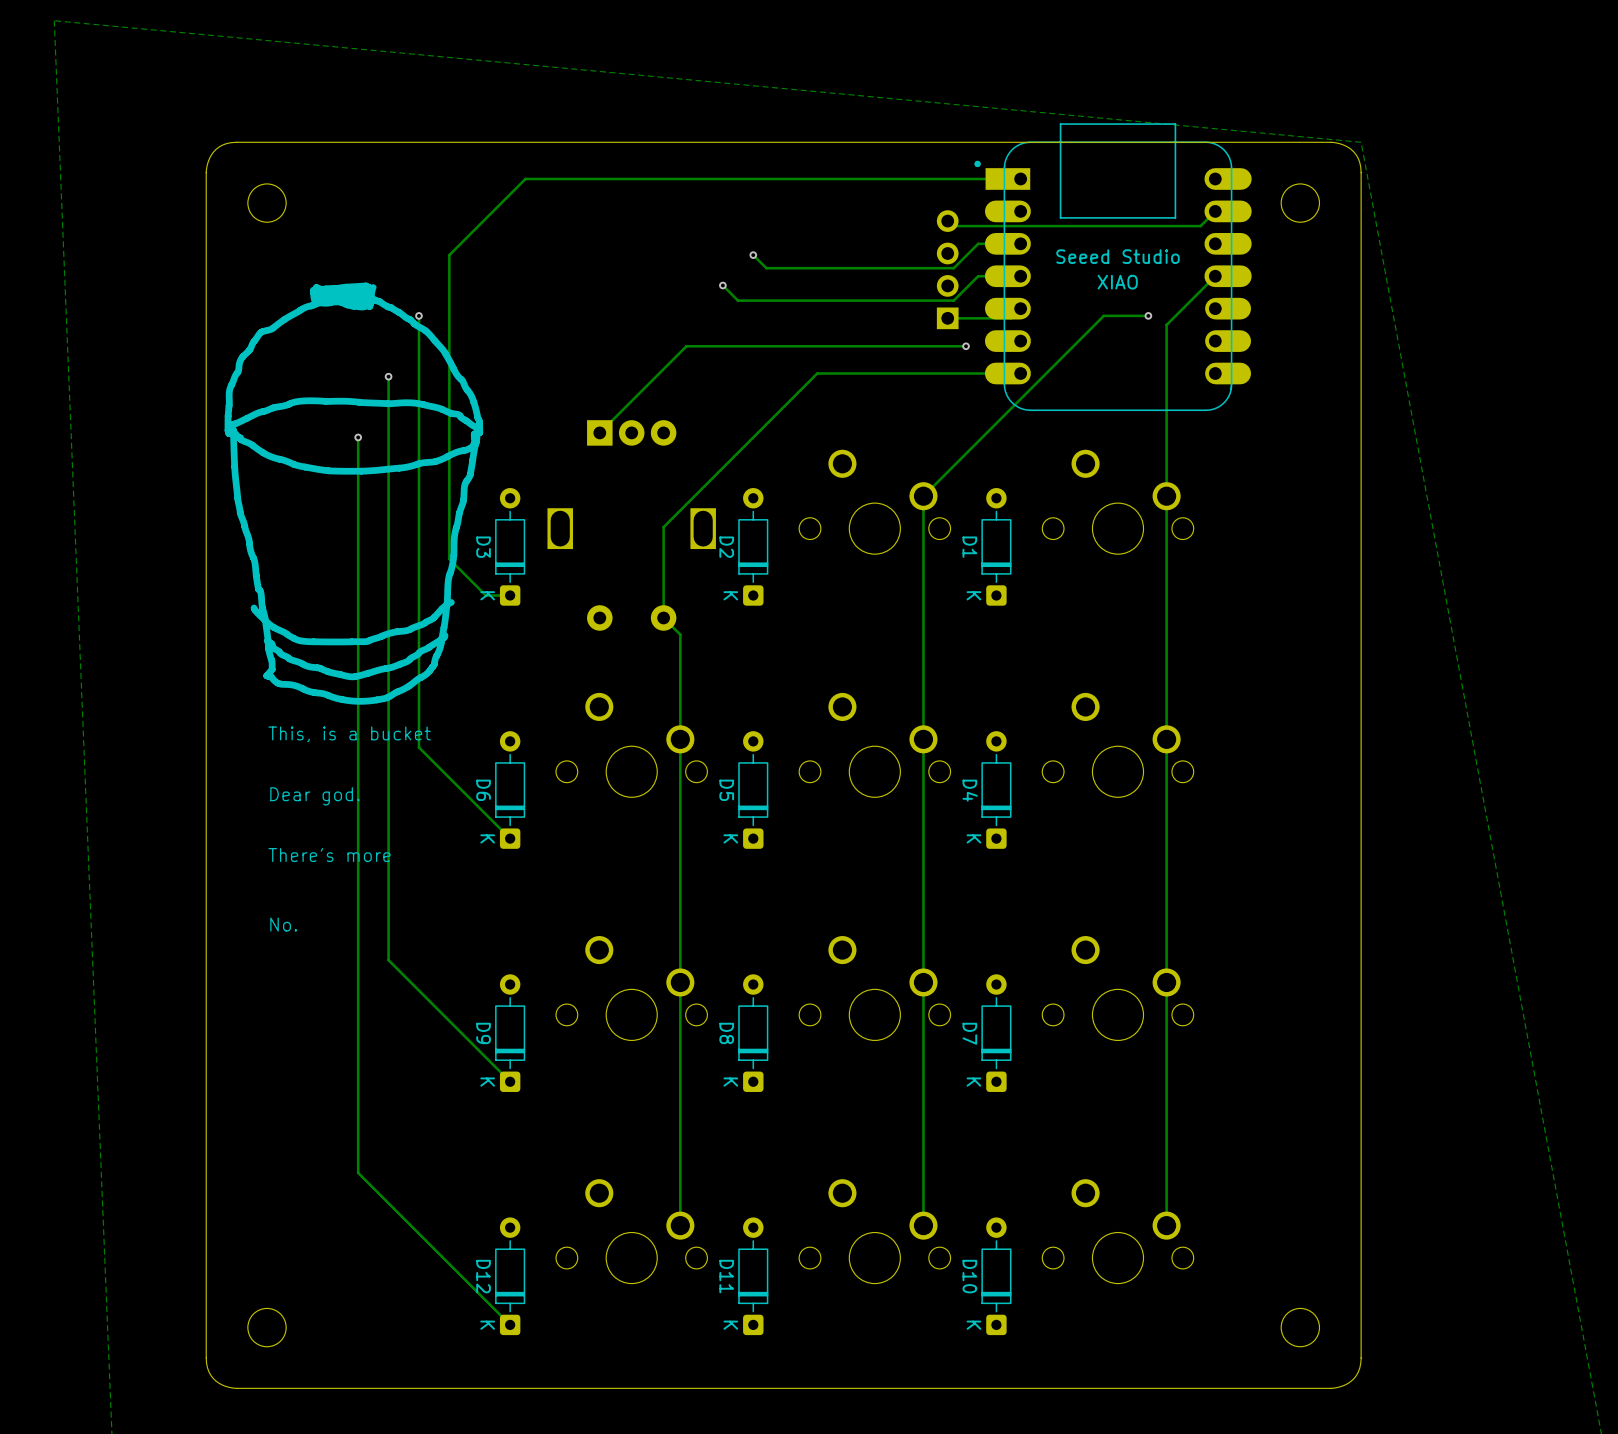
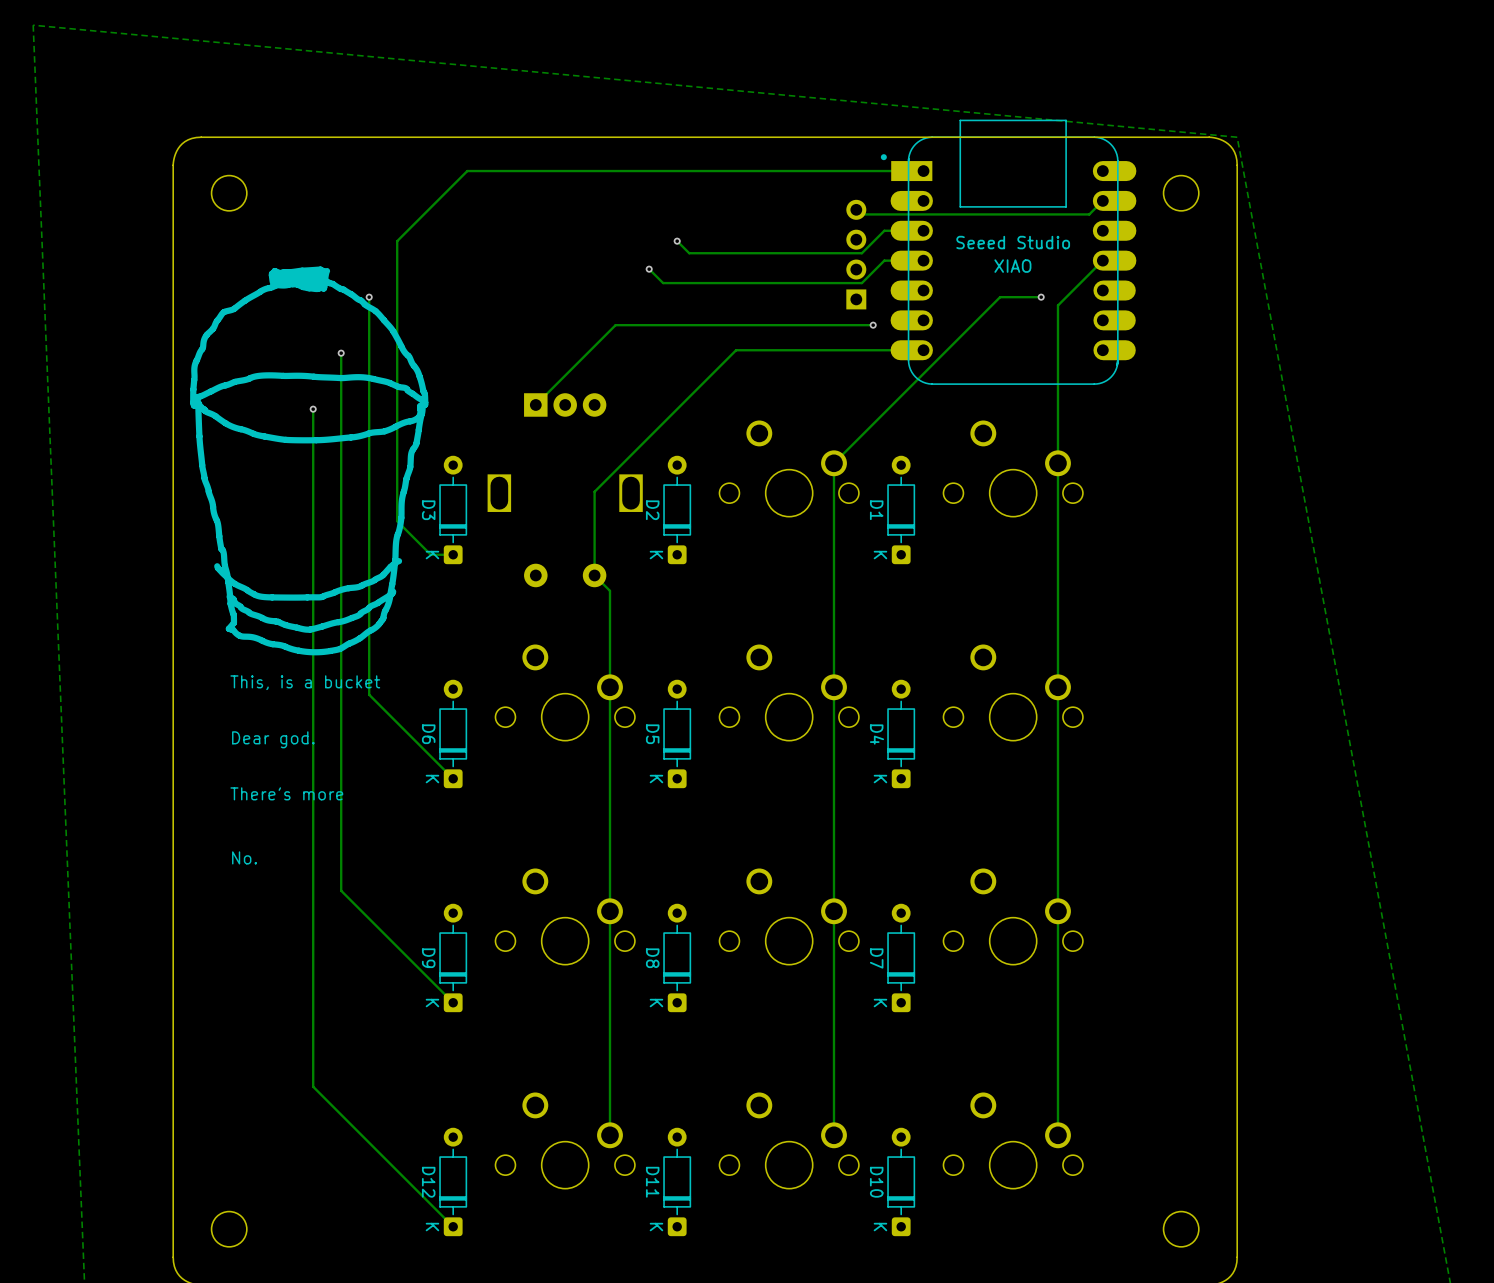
track: (1020, 308) (1011, 318) (947, 318) -> none

